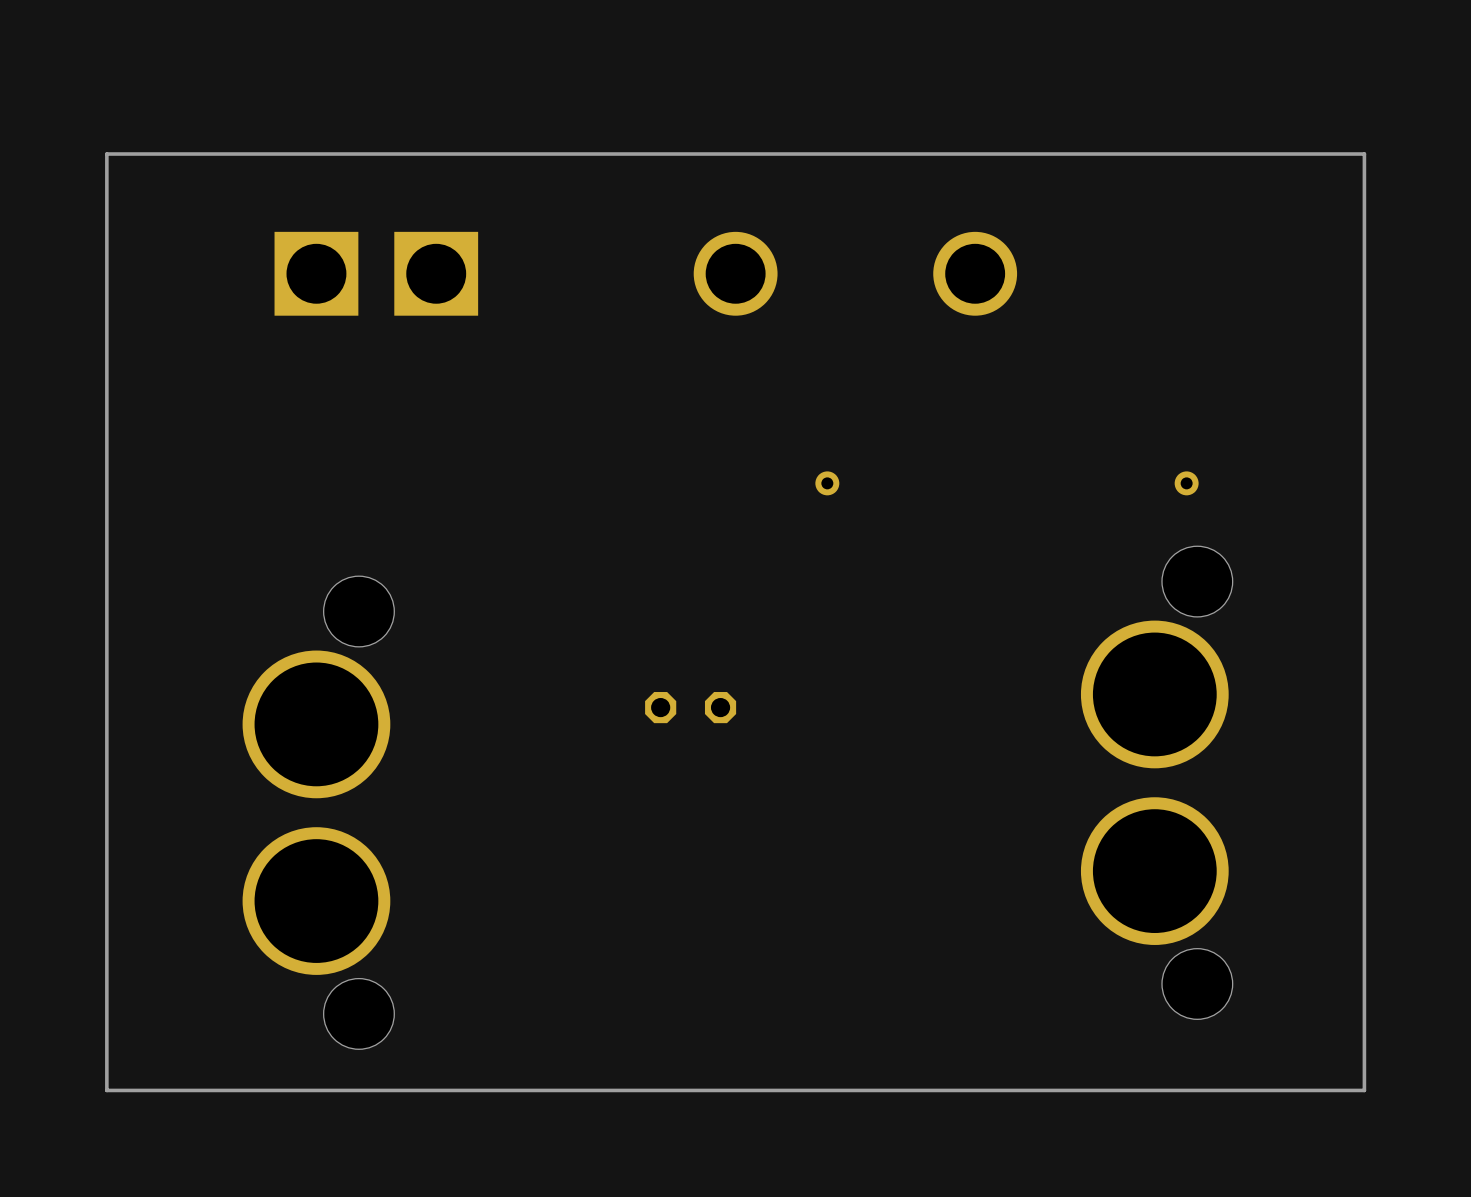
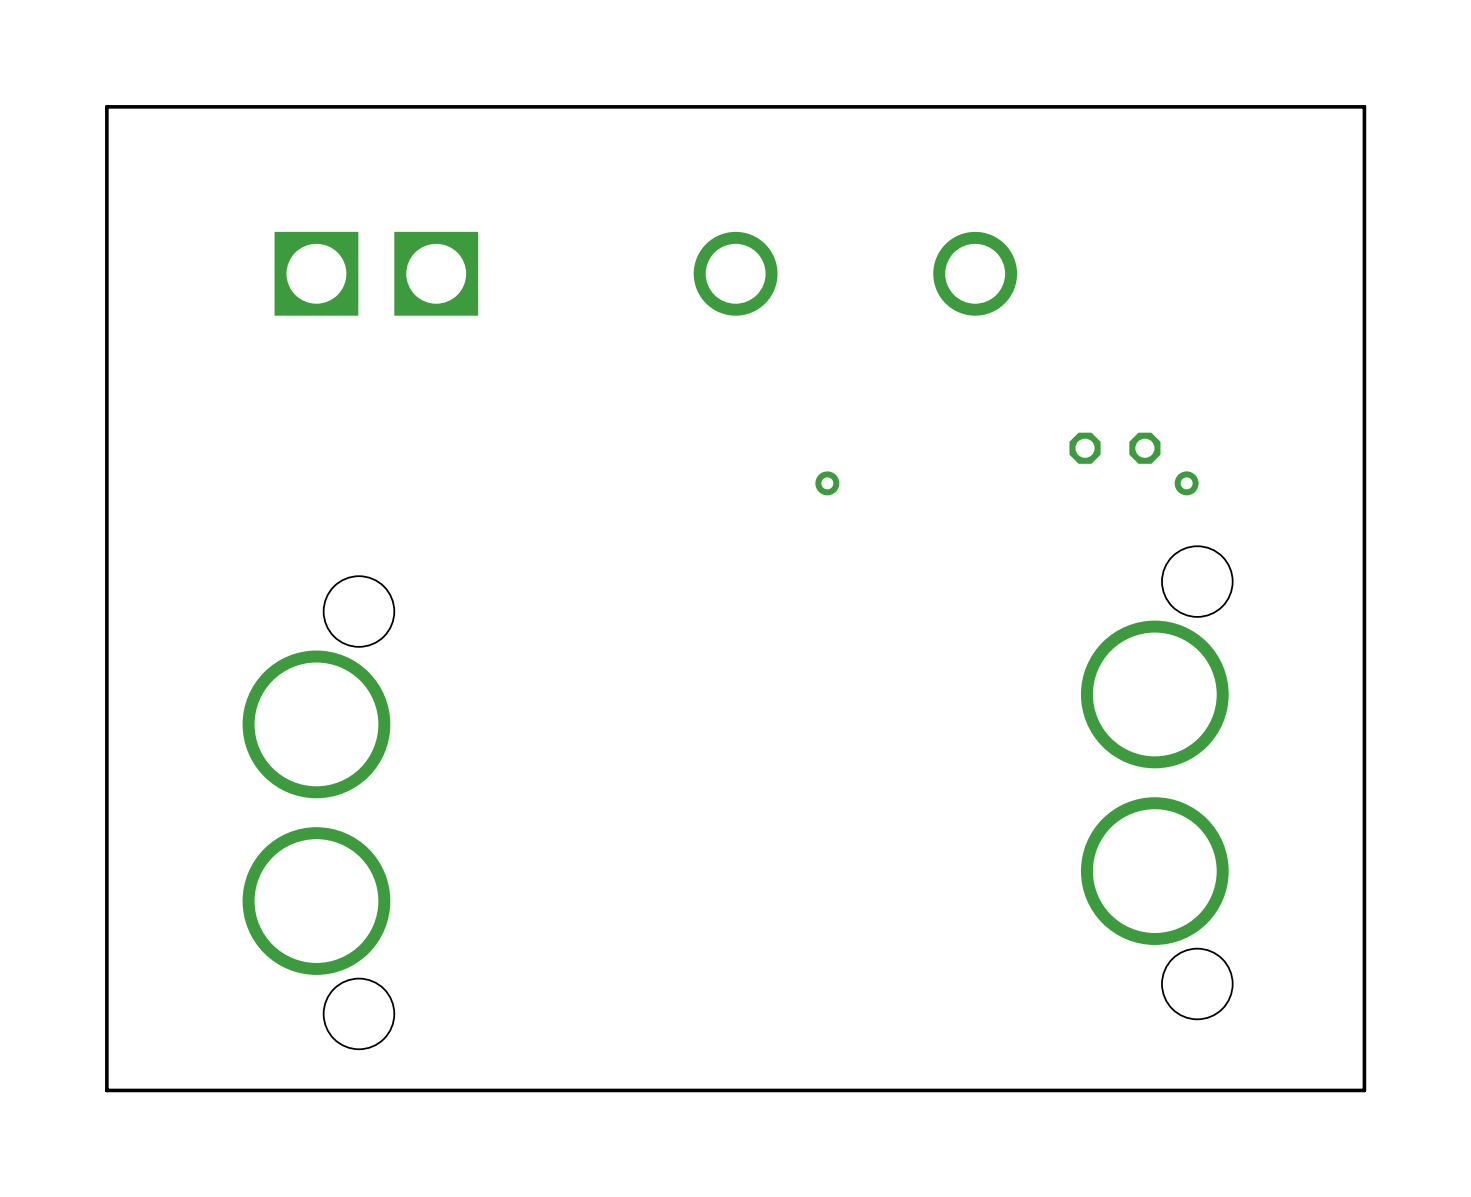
board edge: (1364, 154) (106, 154) -> (1364, 154) (1364, 106) (106, 106) (106, 154)
part position: (690, 707) -> (1114, 448)

